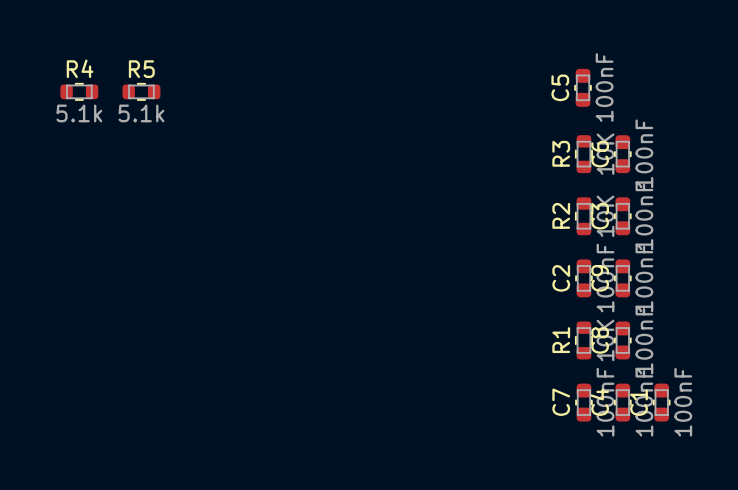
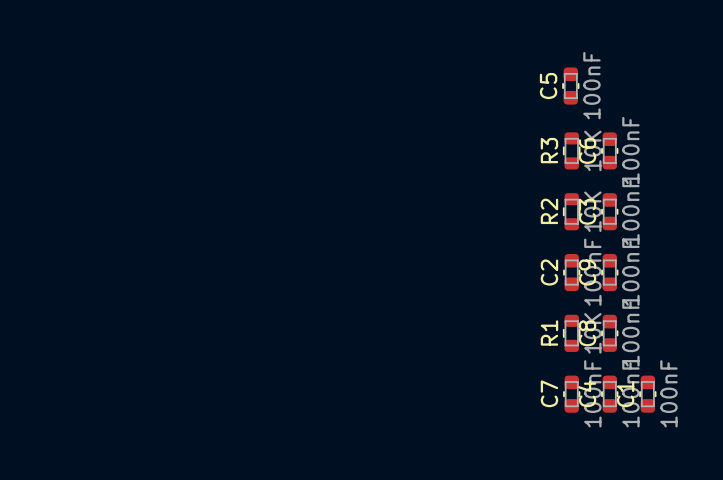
R4: 5.1k (79, 91) -> none
R5: 5.1k (141, 91) -> none

